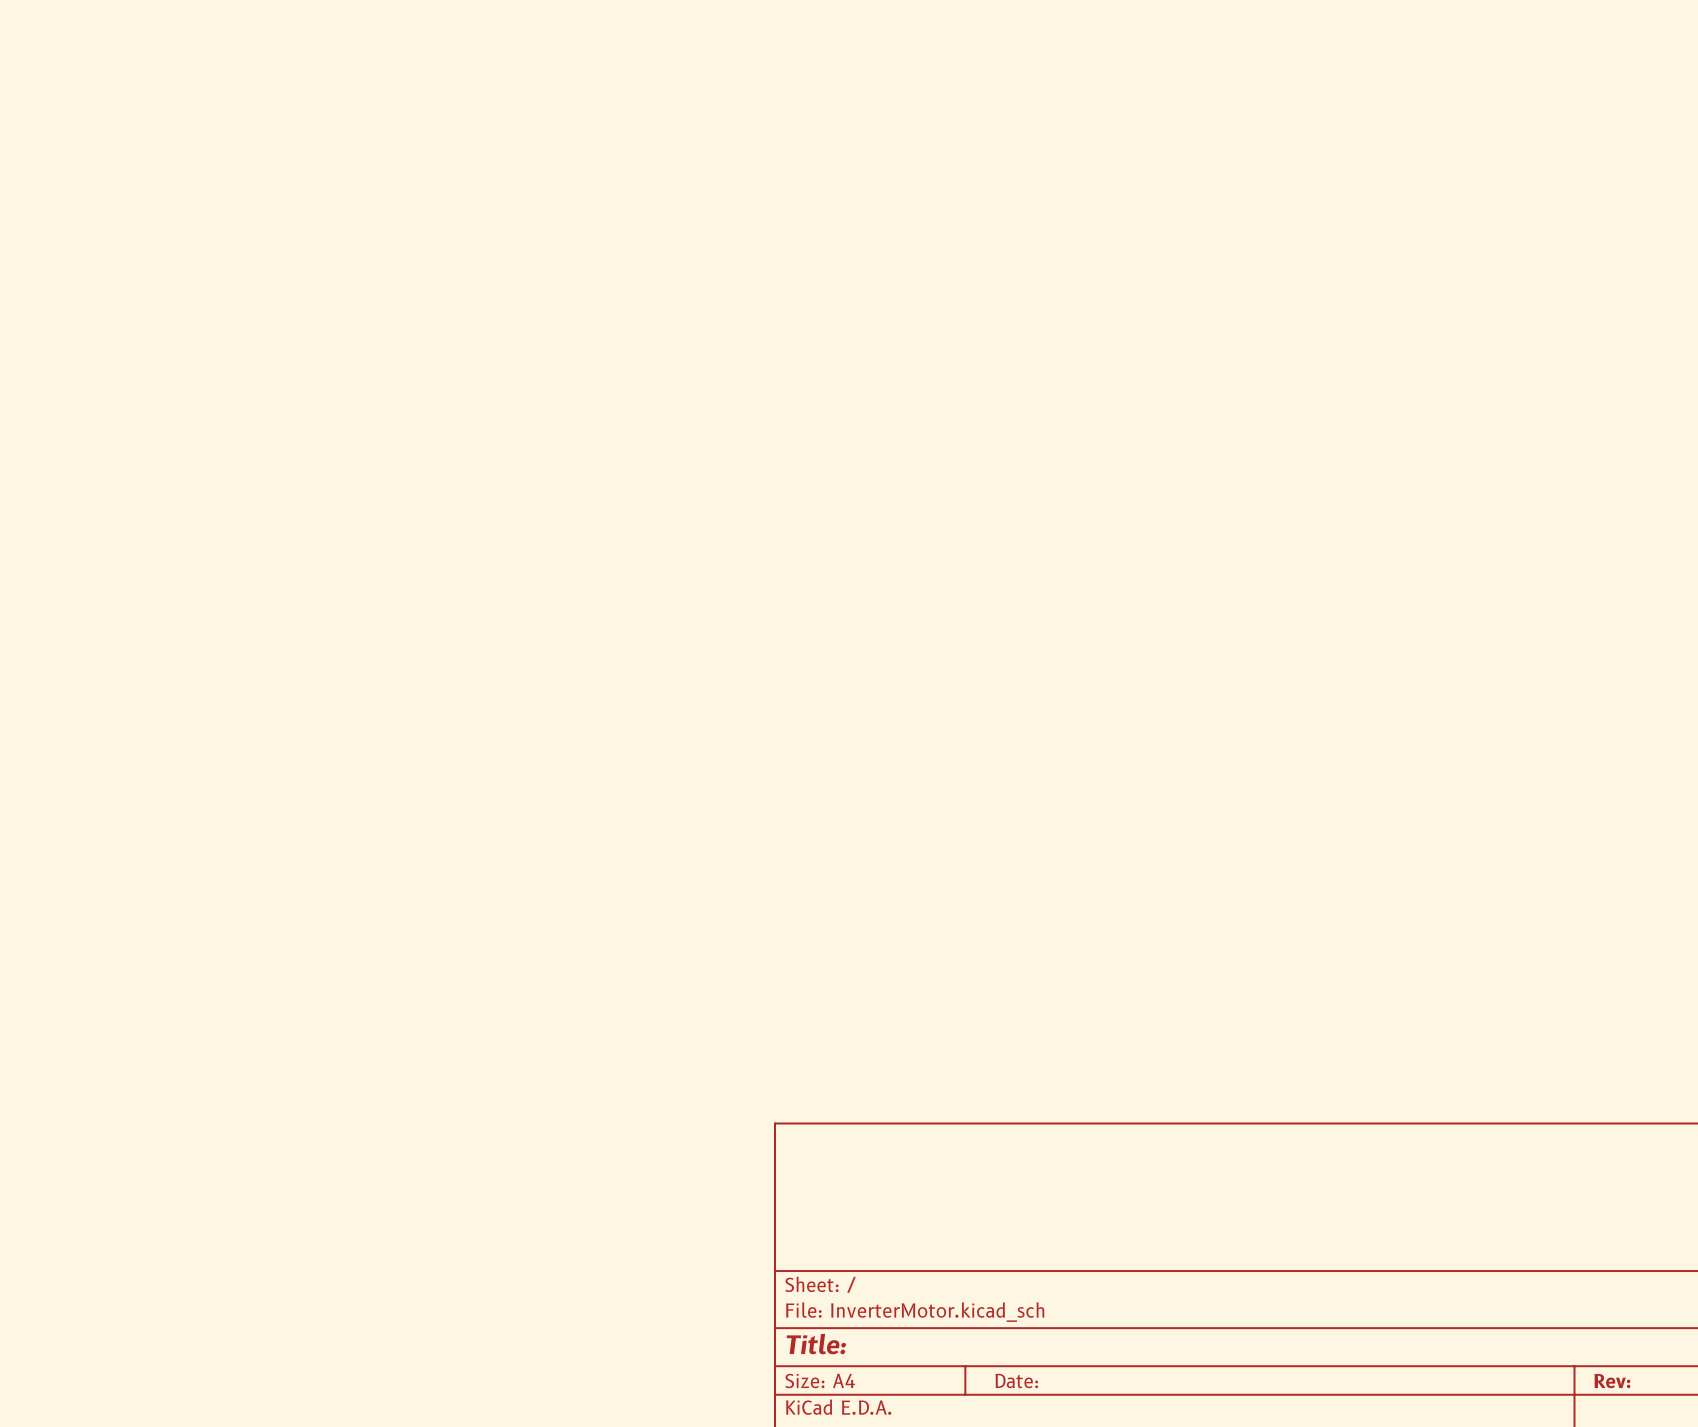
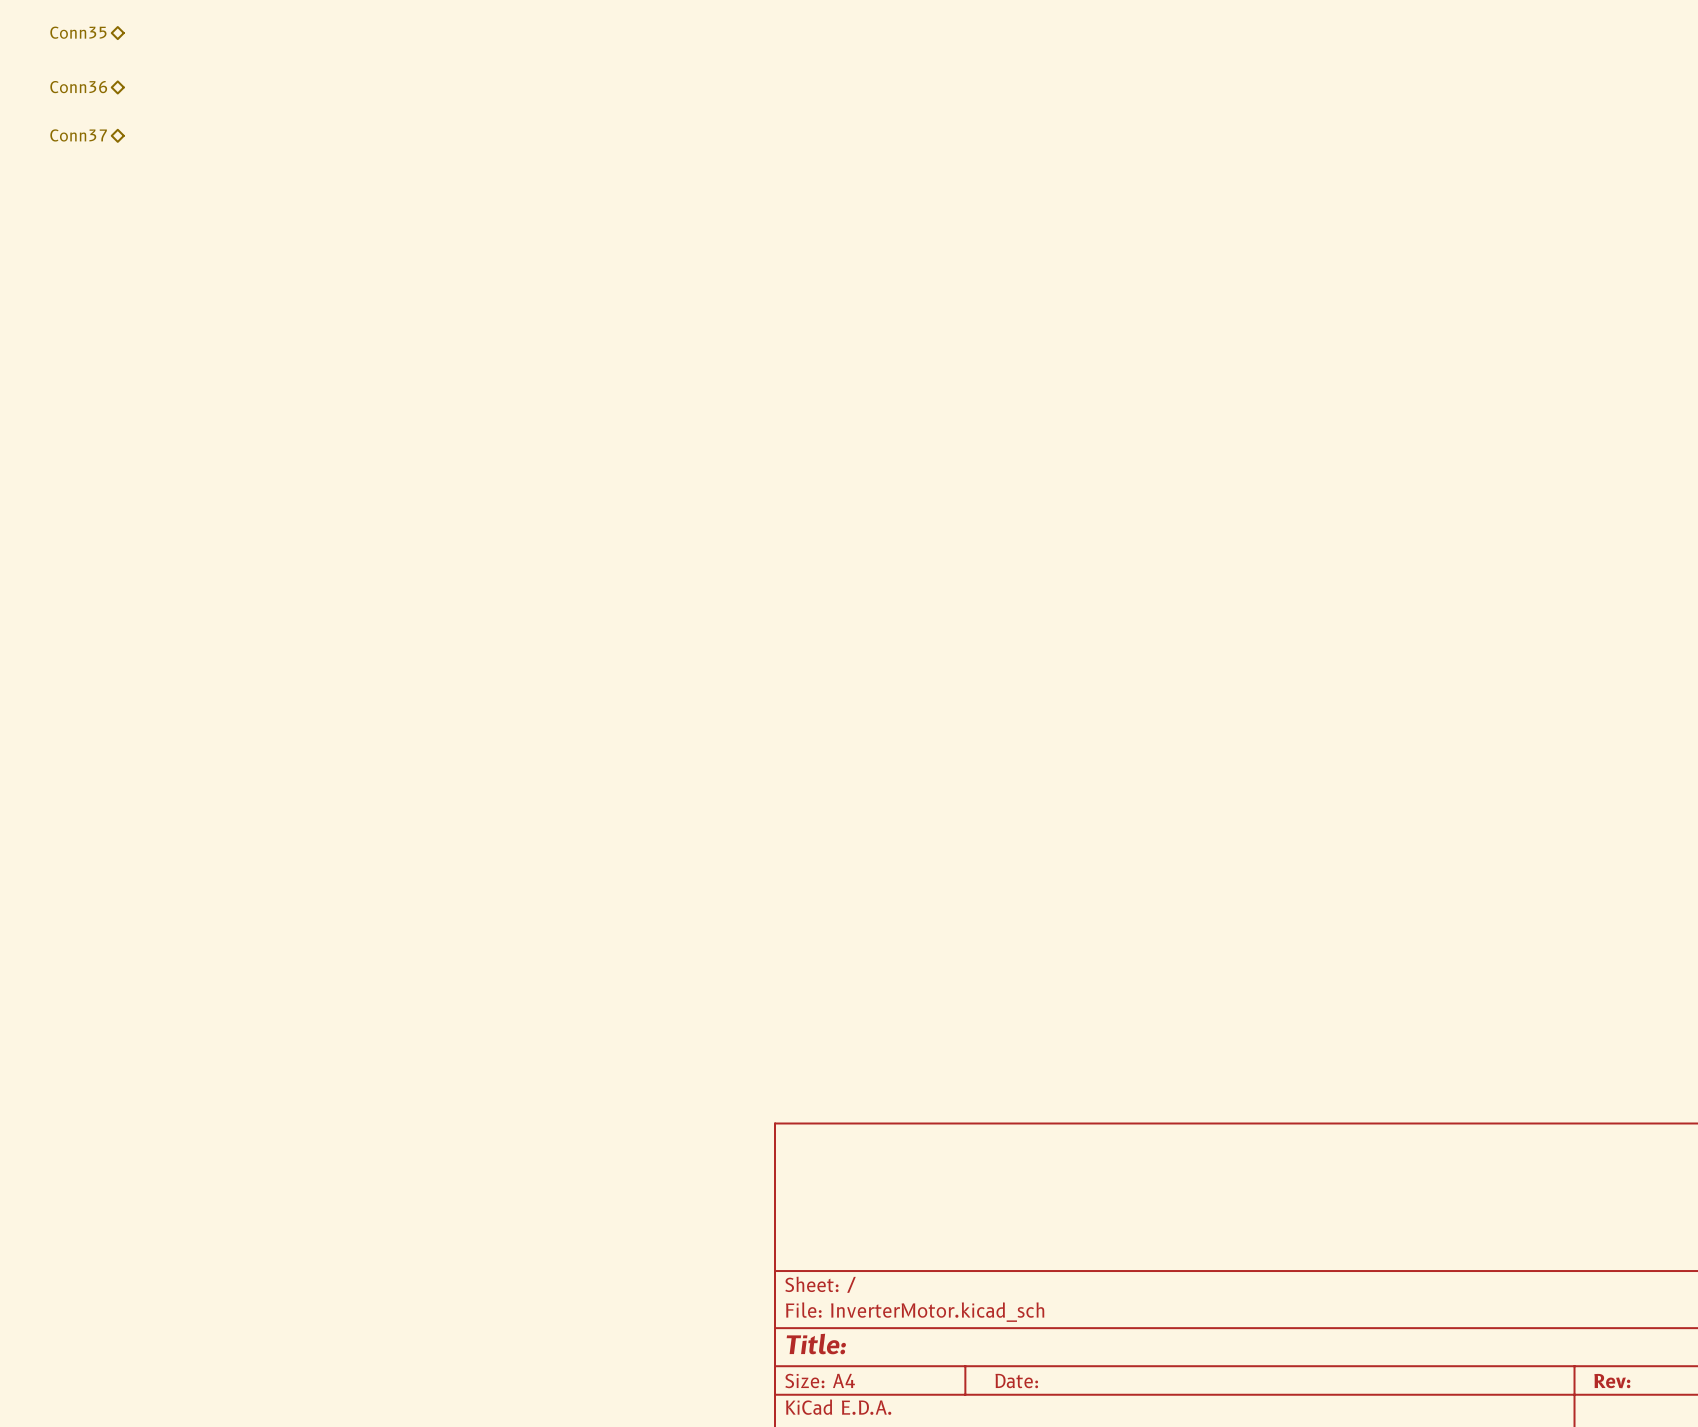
hierarchical label: none -> Conn35 (78, 32)
hierarchical label: none -> Conn36 (78, 87)
hierarchical label: none -> Conn37 (78, 135)

